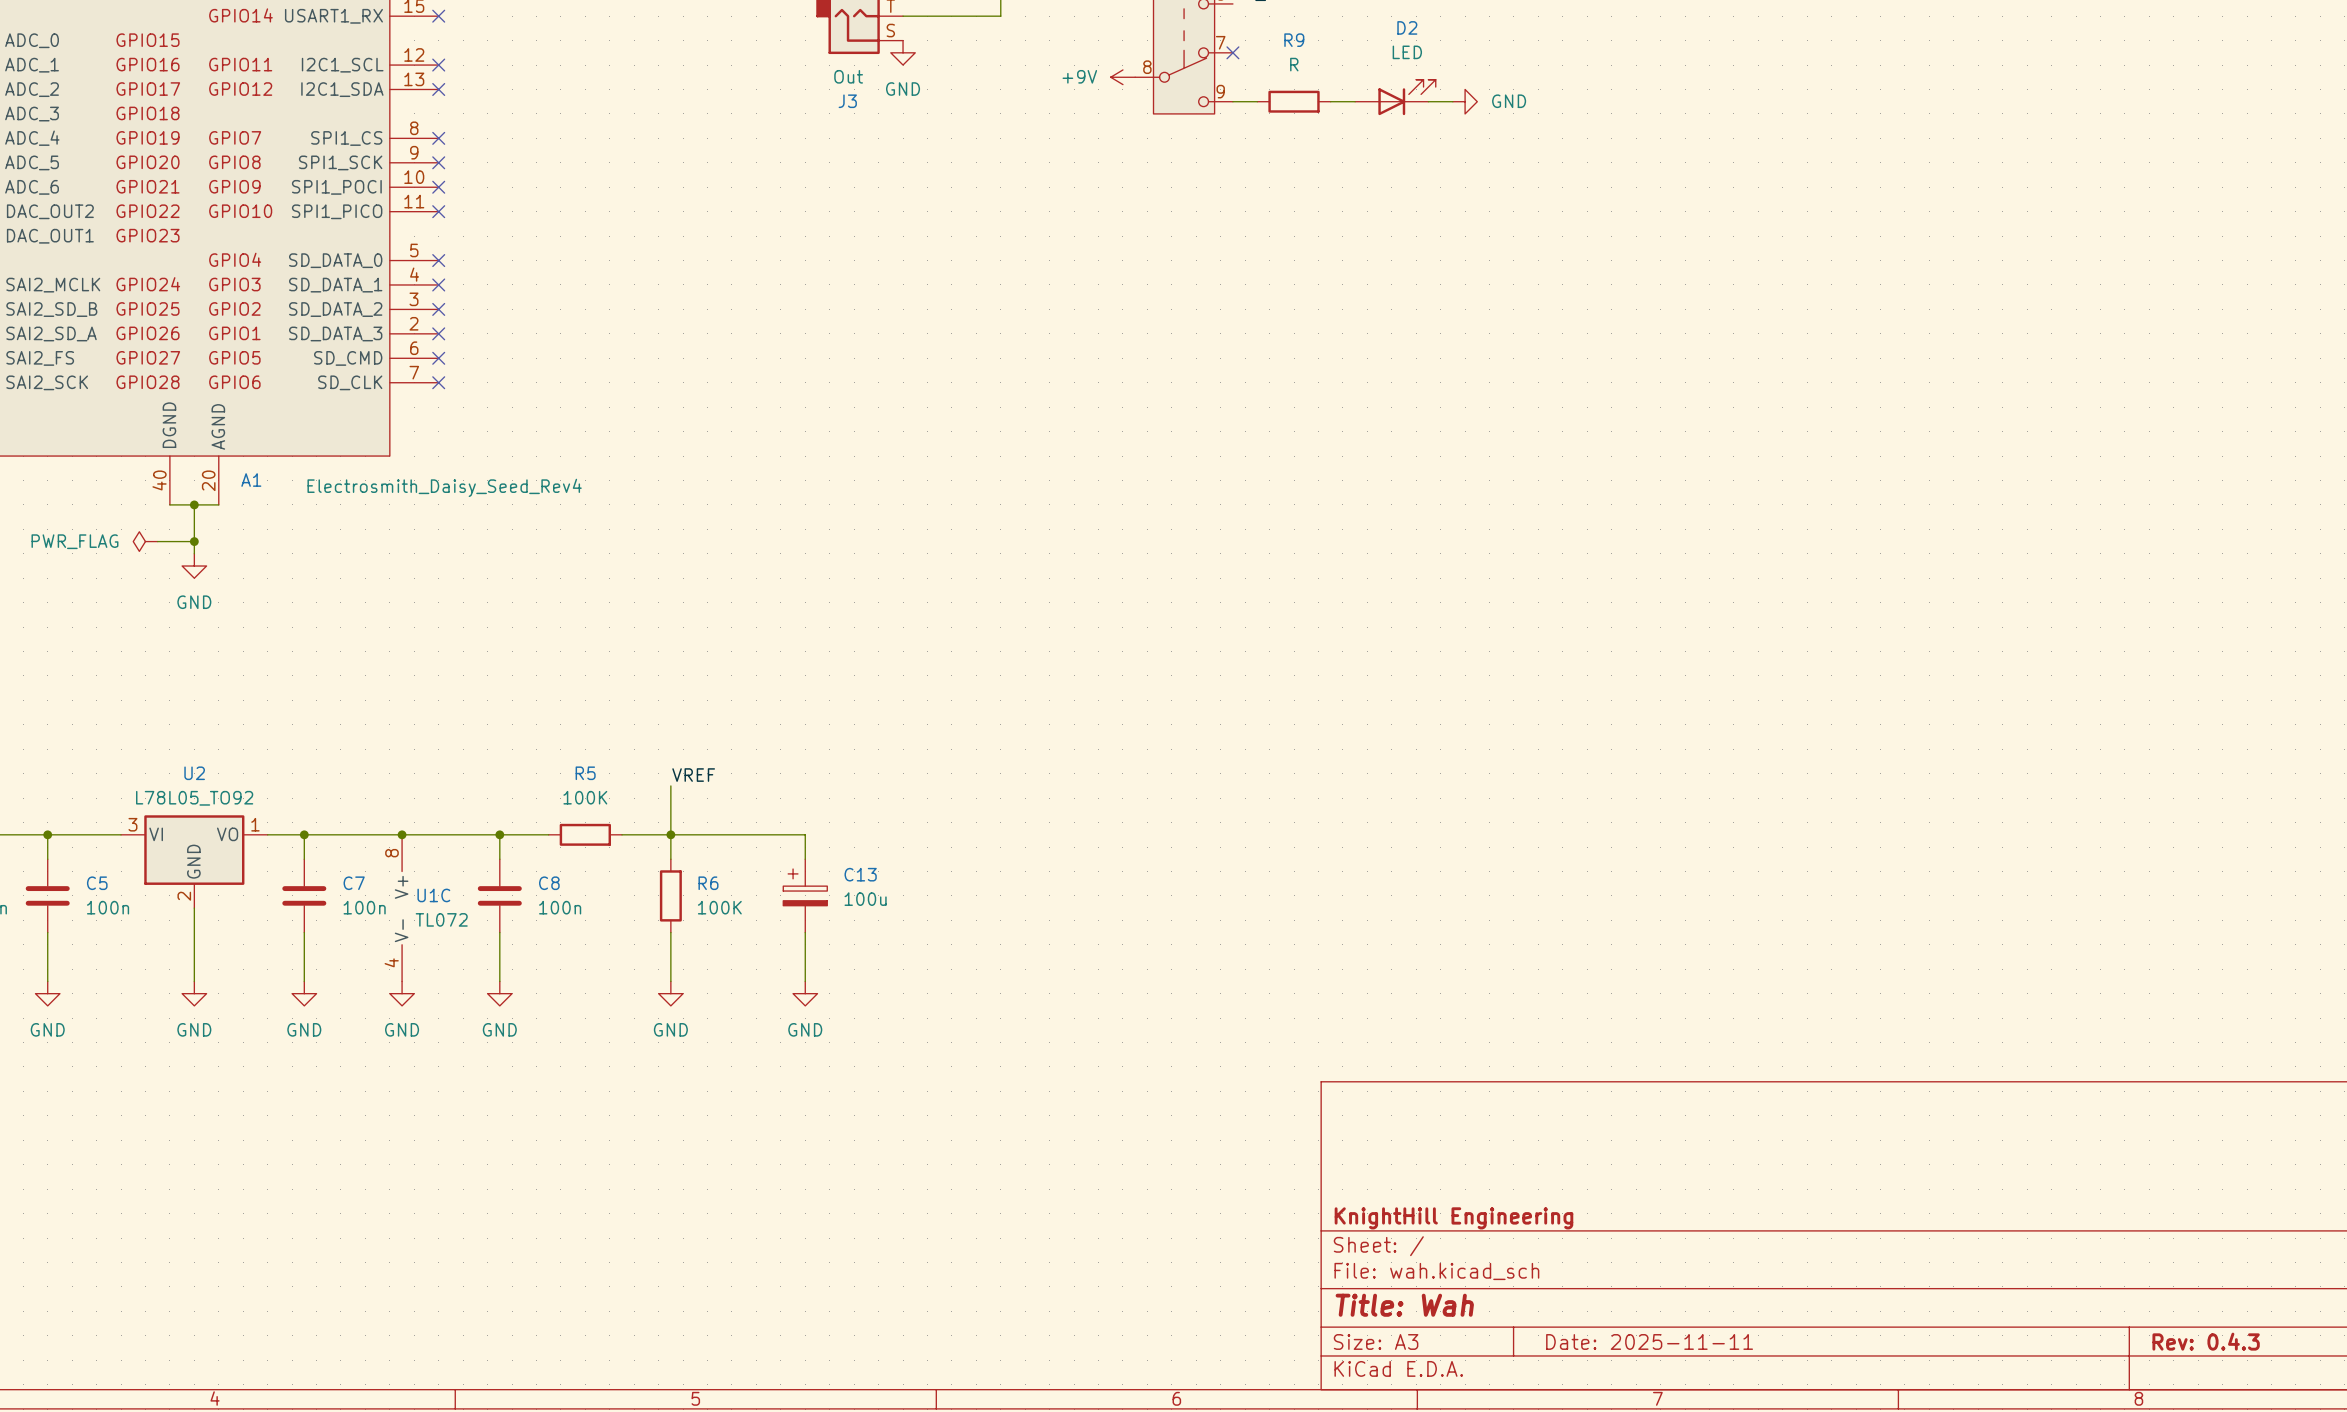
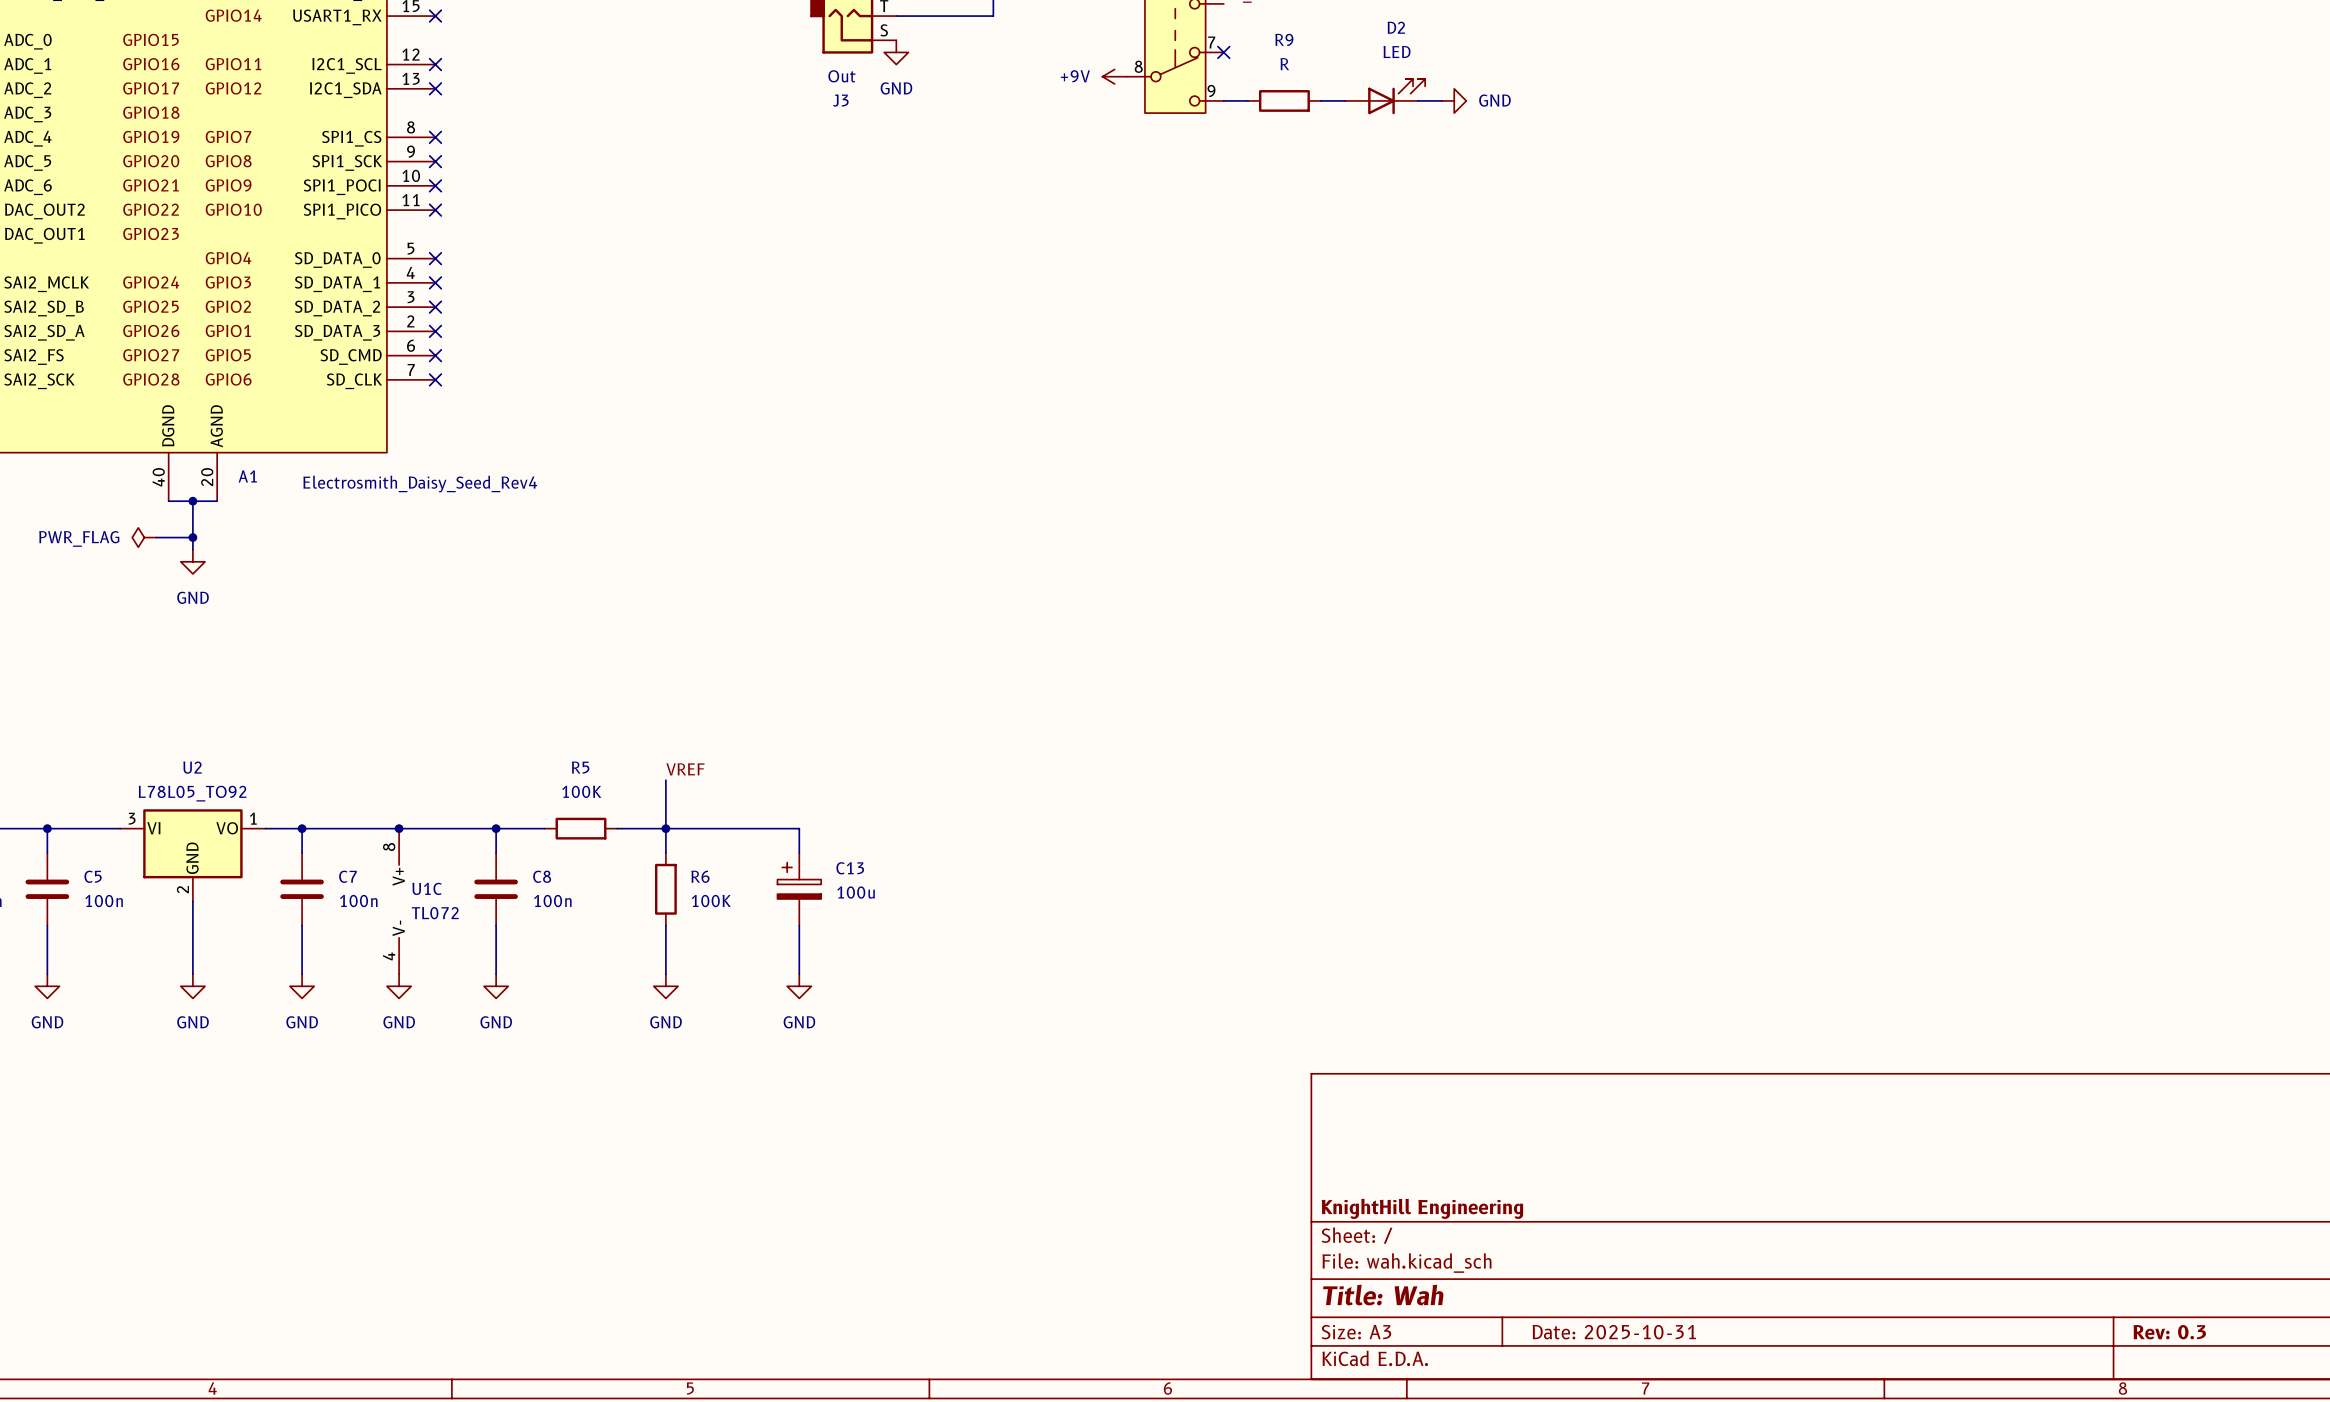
title block: Date: 2025-11-11 (1649, 1341) -> Date: 2025-10-31 (1614, 1332)
title block: Rev: 0.4.3 (2206, 1341) -> Rev: 0.3 (2169, 1332)

